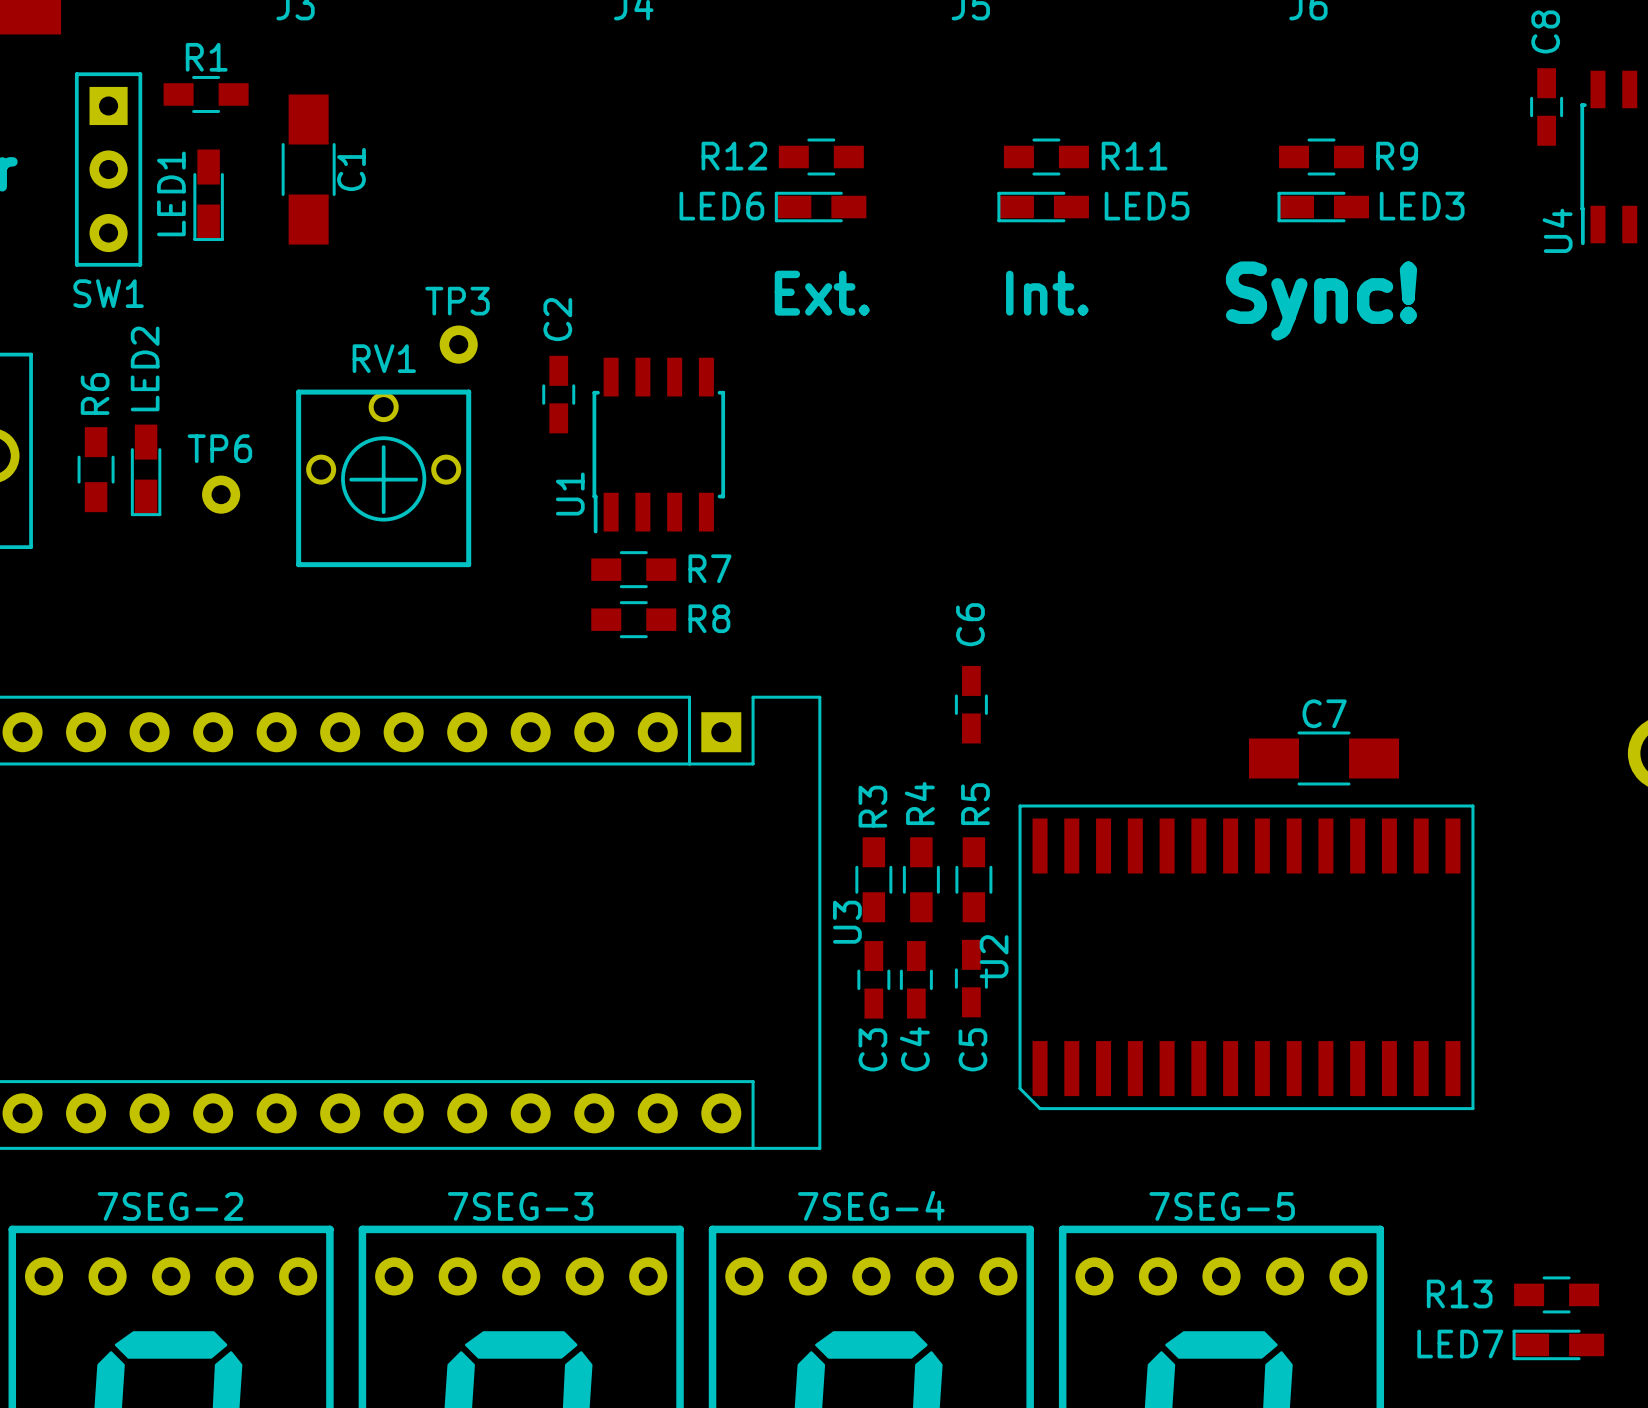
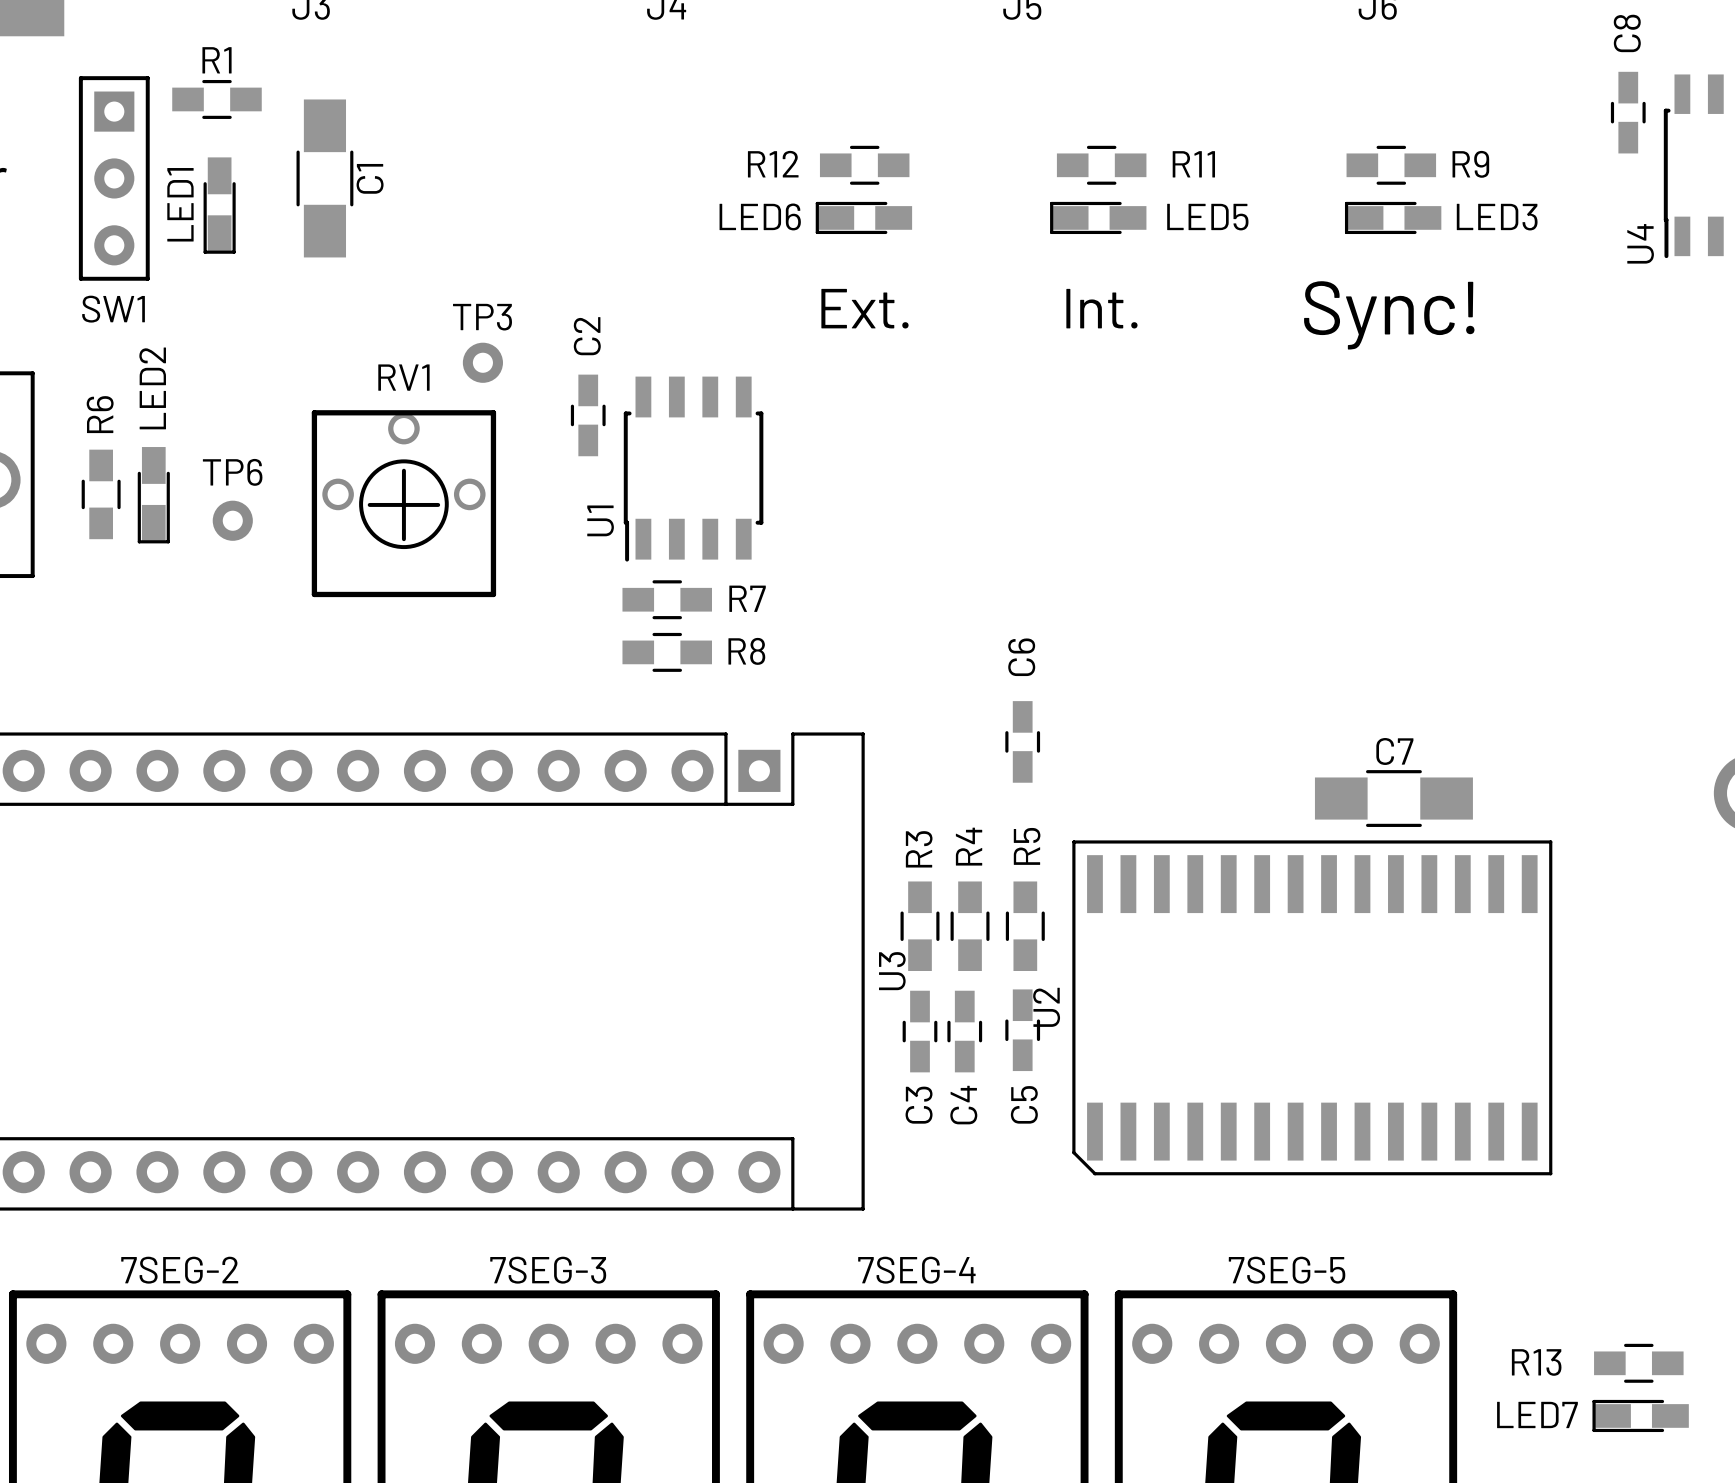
U2 footprint: [1018, 804, 1475, 1111] -> [1072, 840, 1553, 1176]

